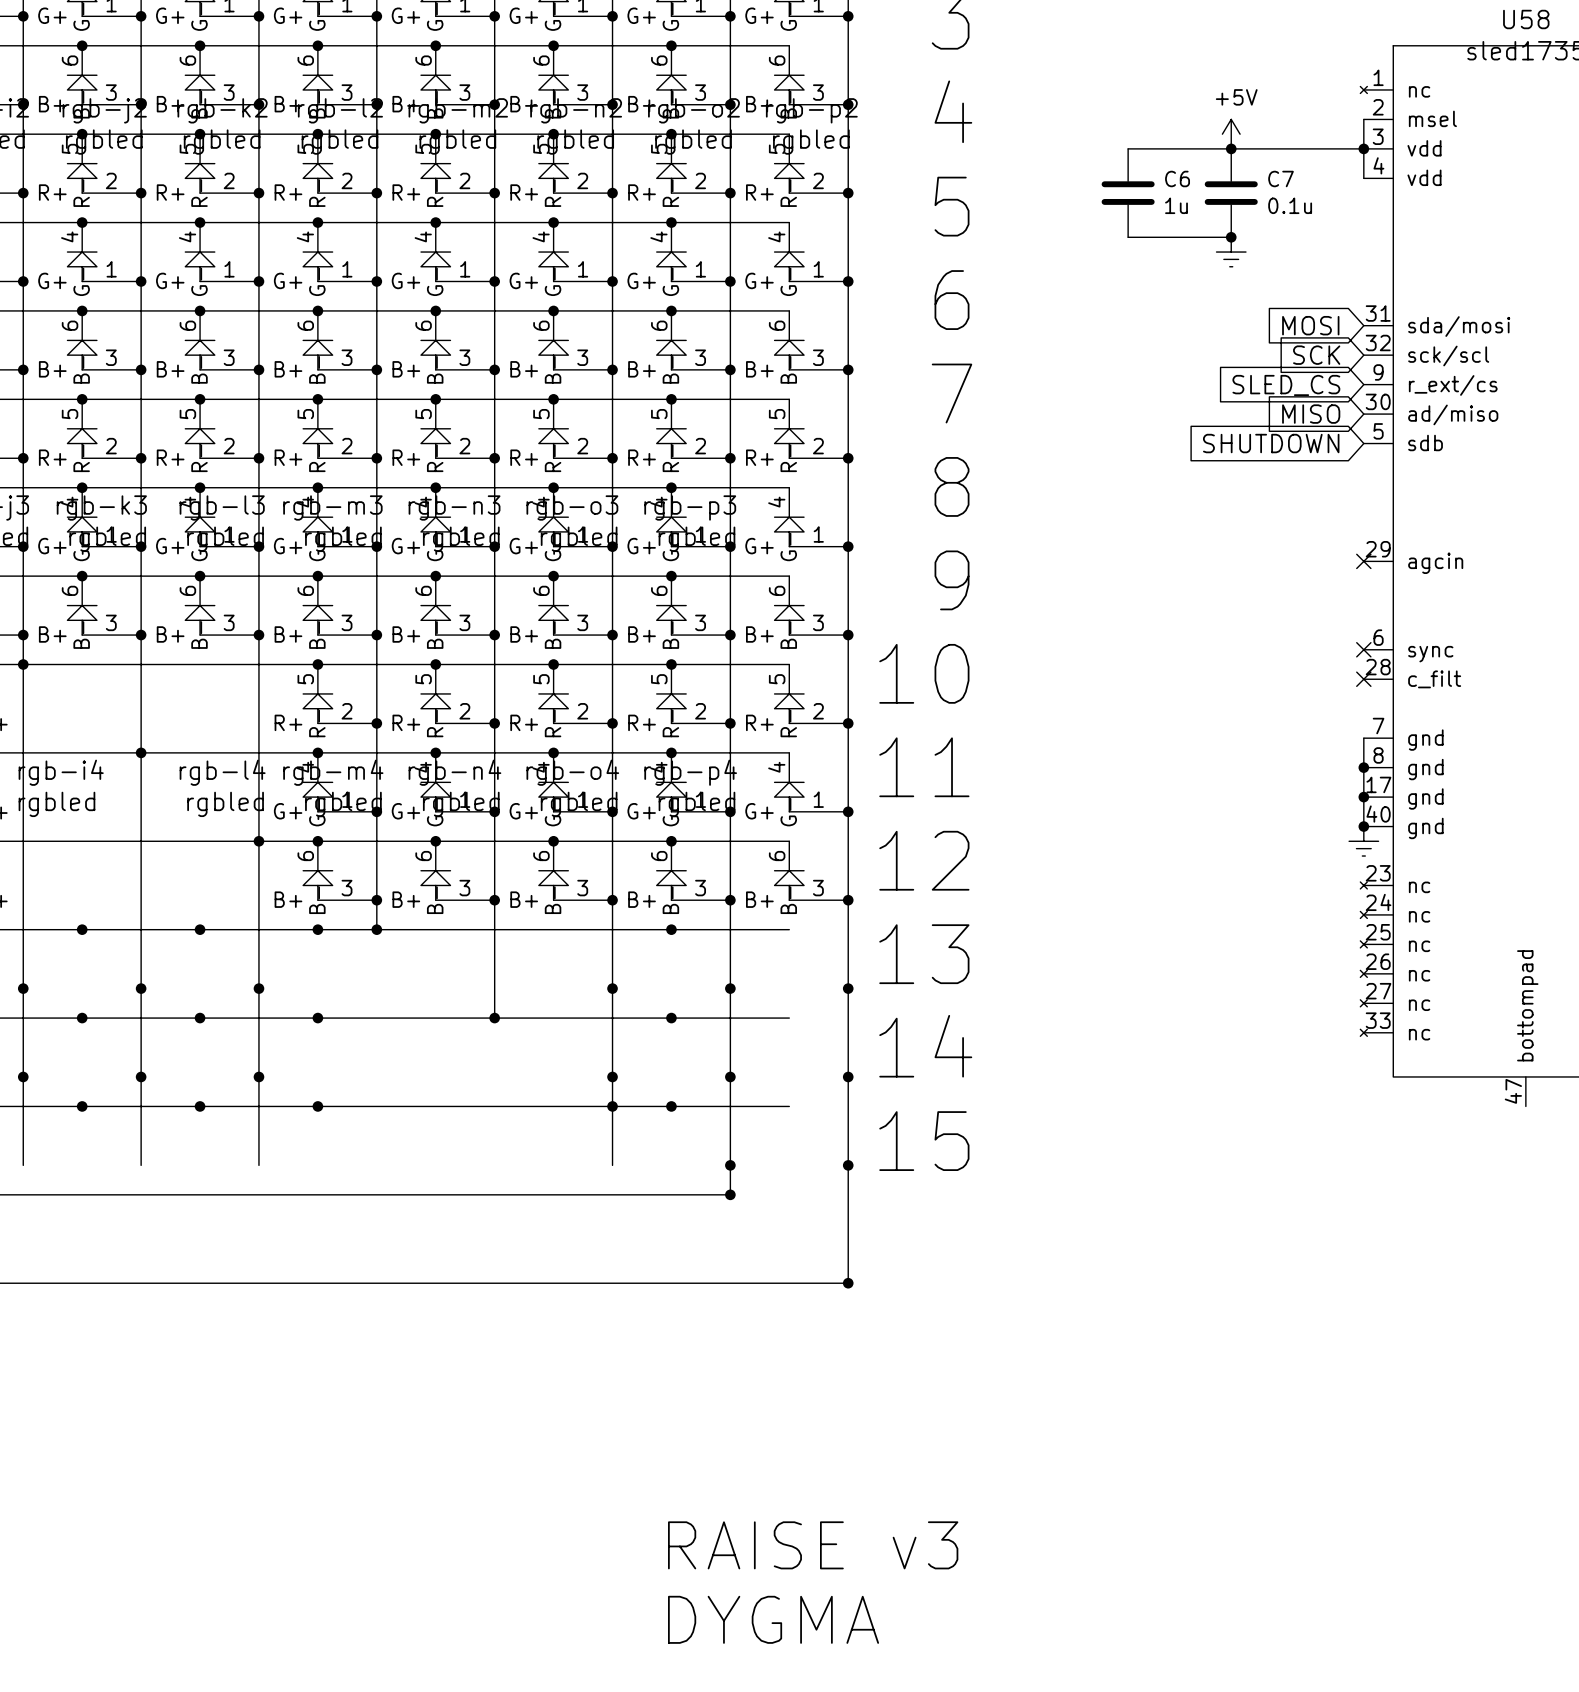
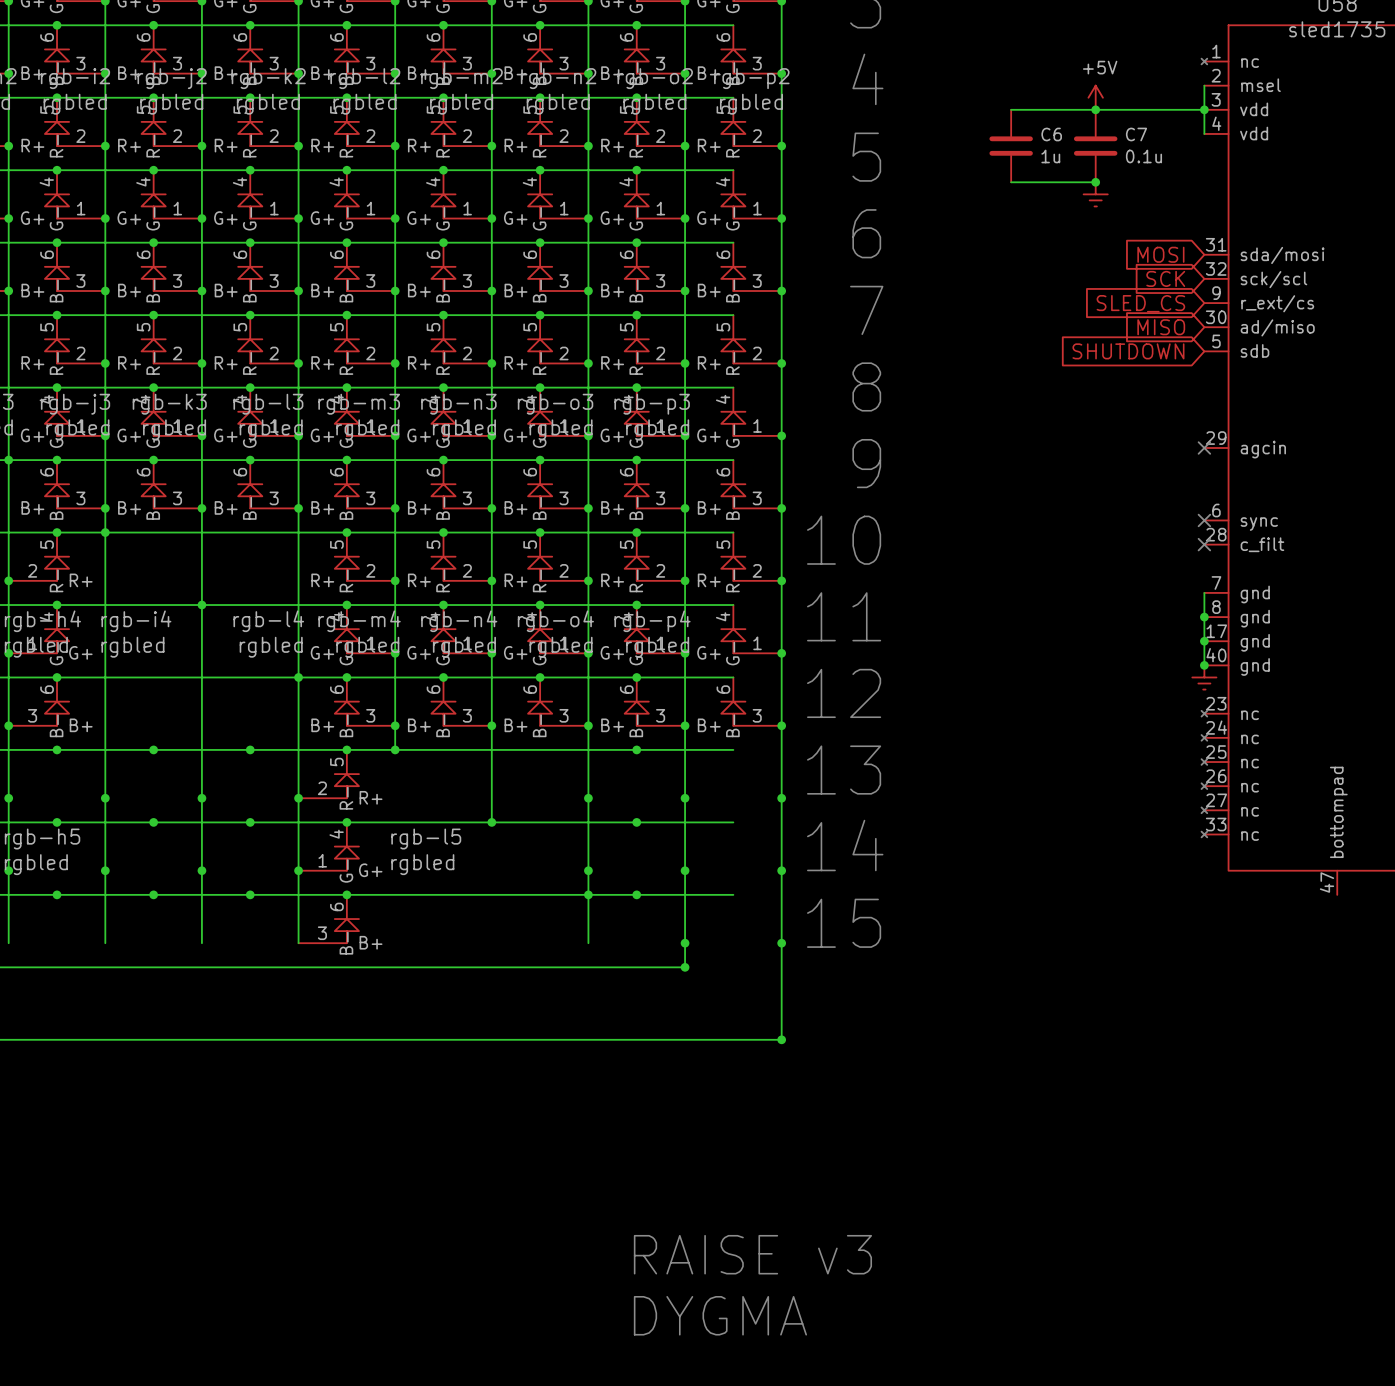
rgb-l5: none -> rgbled (328, 846)

